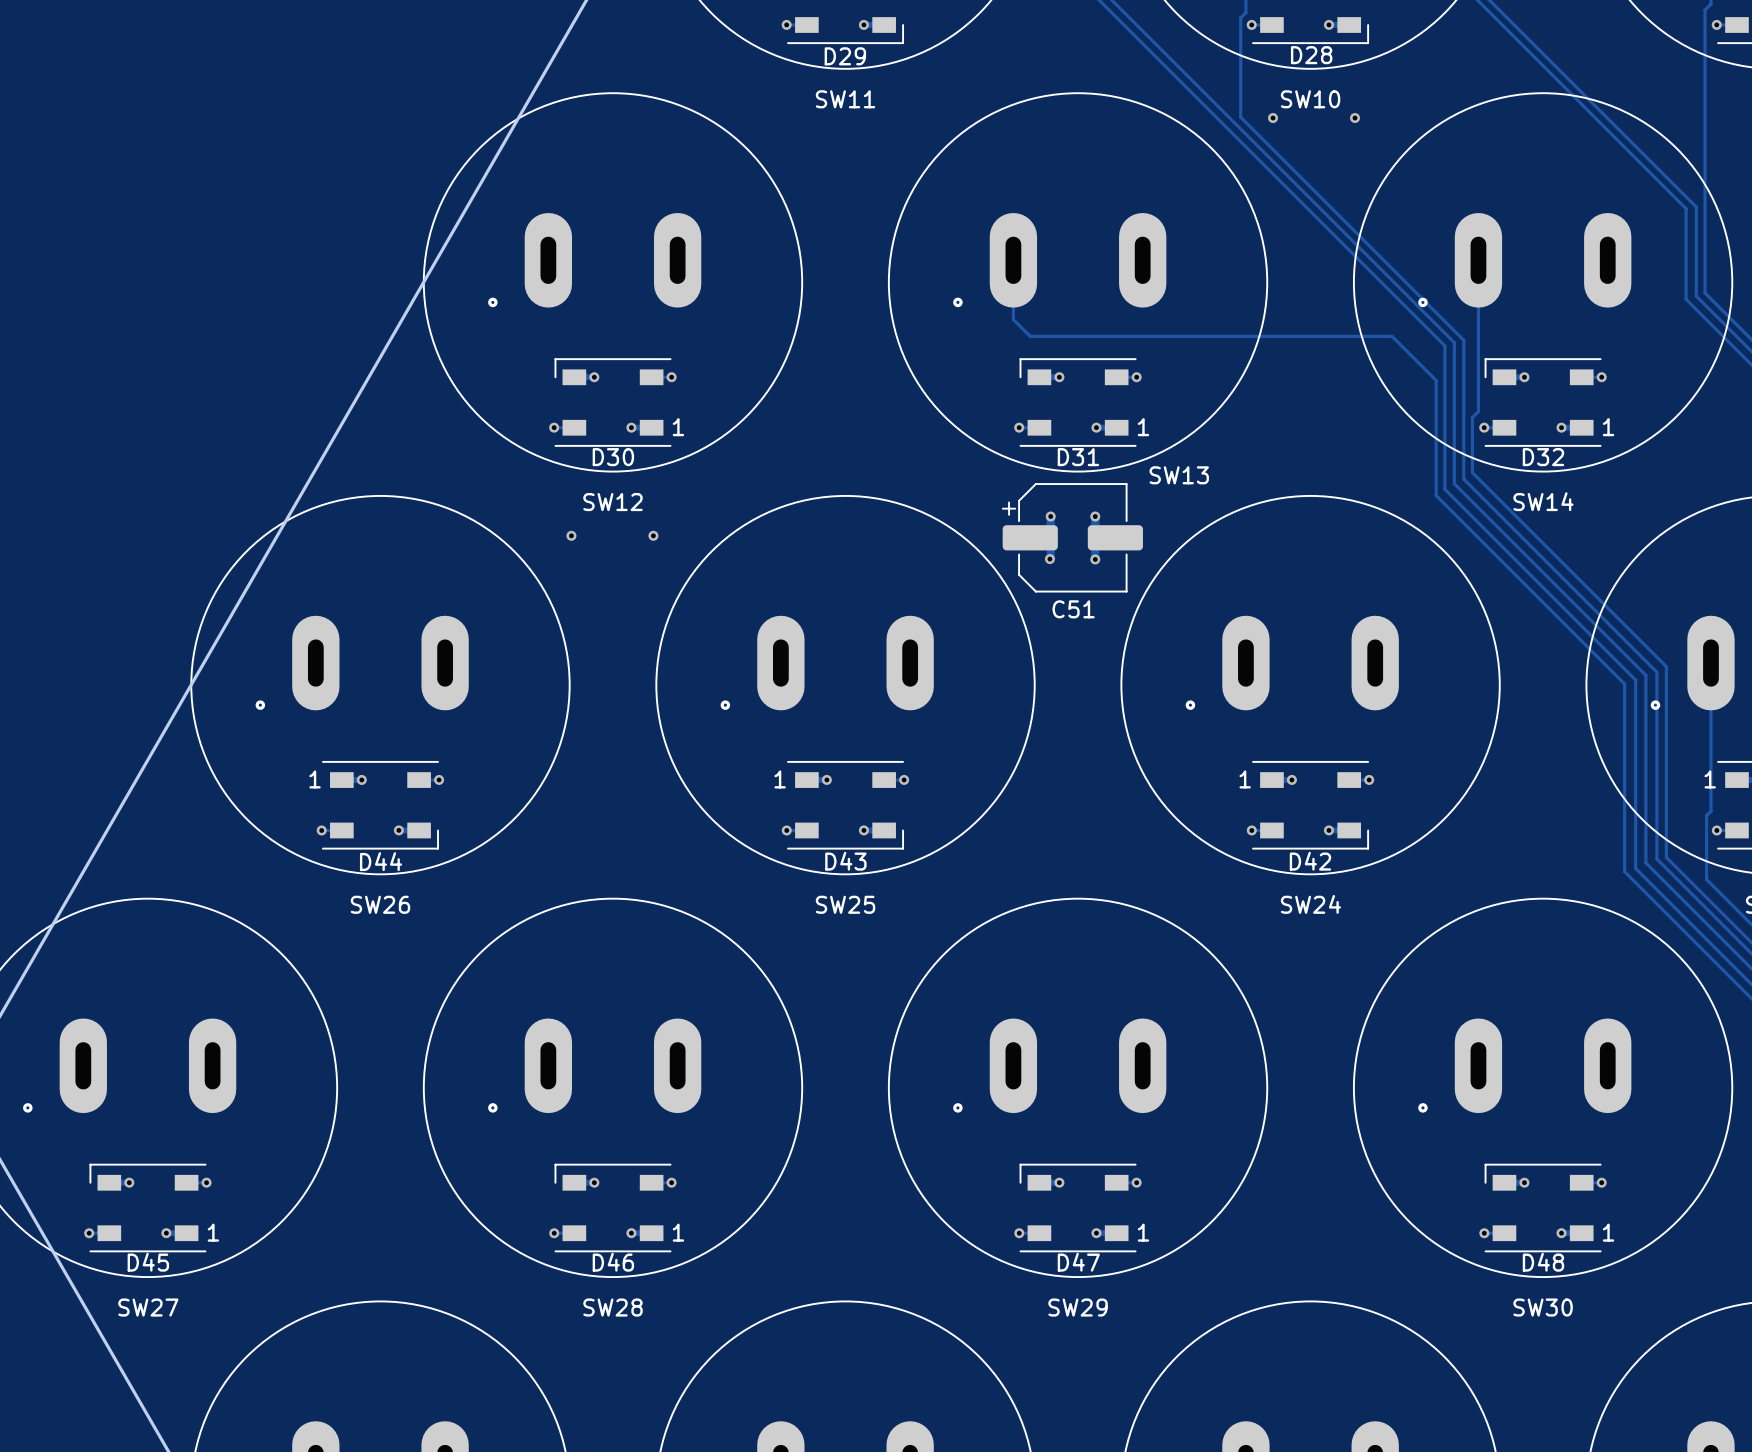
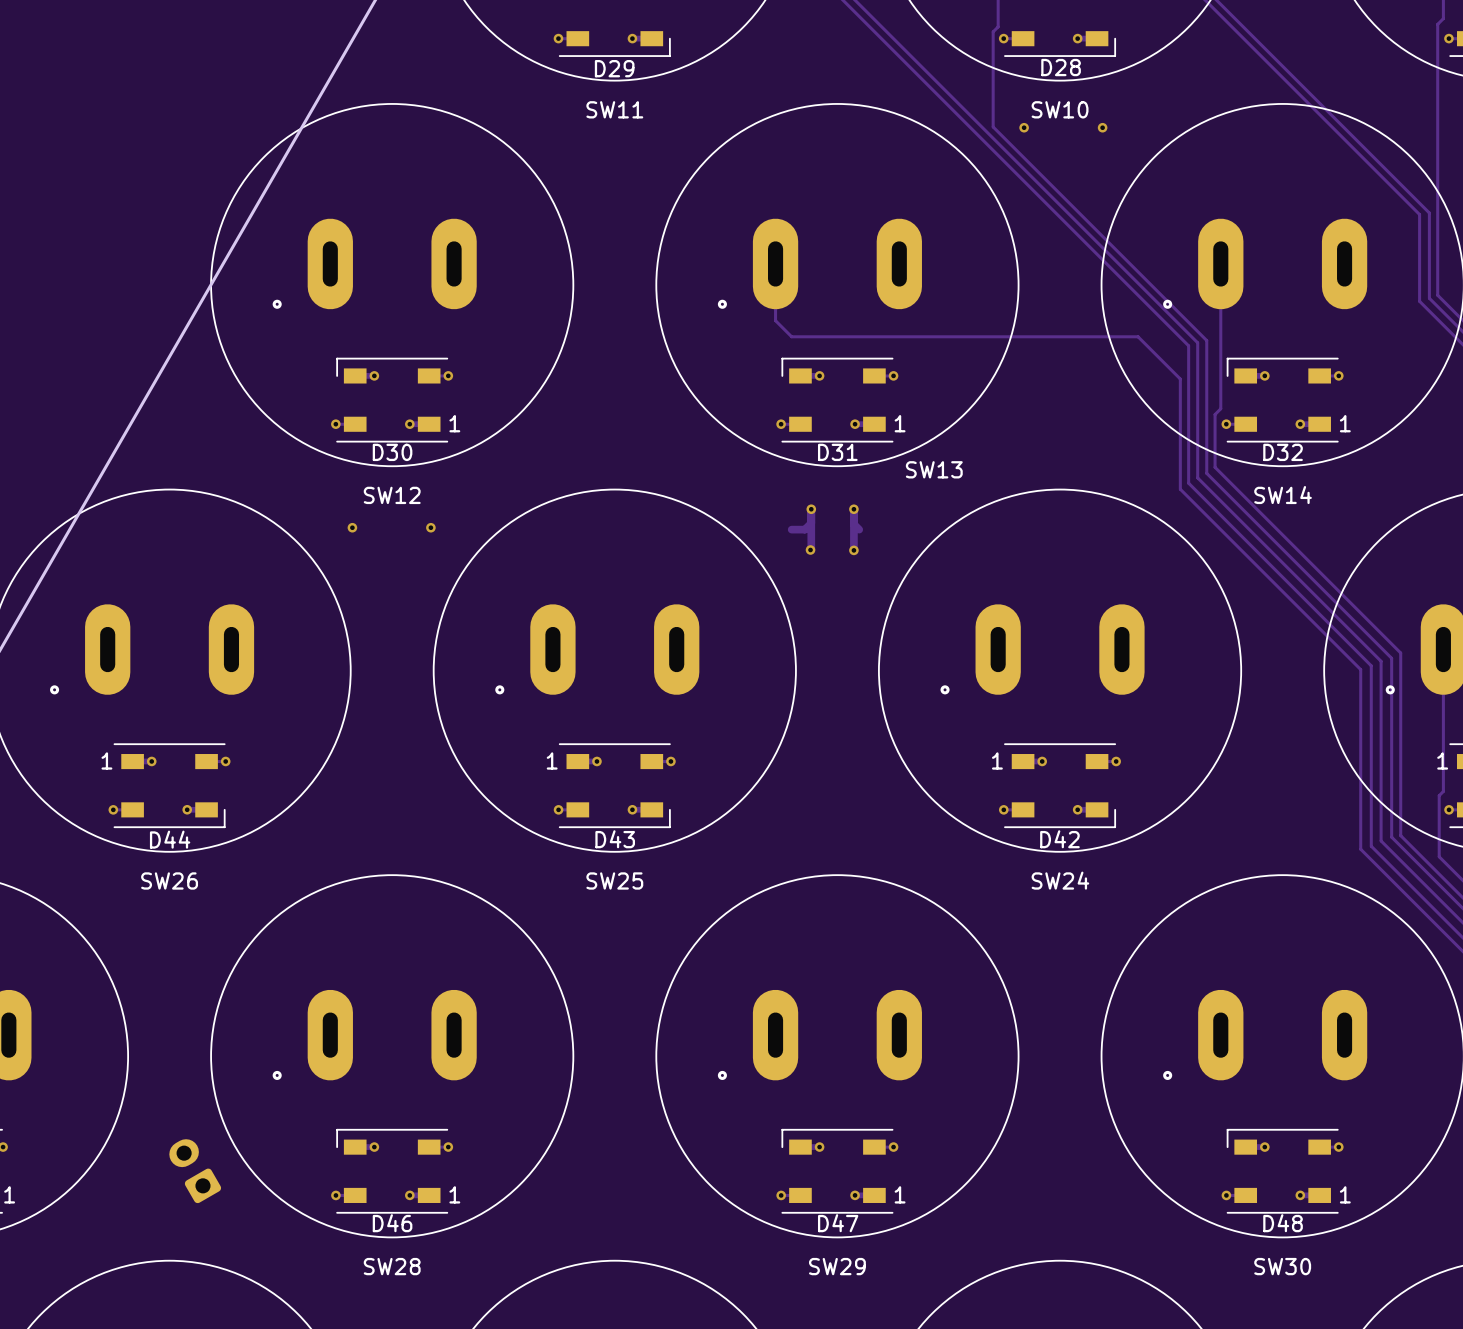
C51: (1072, 537) -> none
part: none -> (195, 1171)

